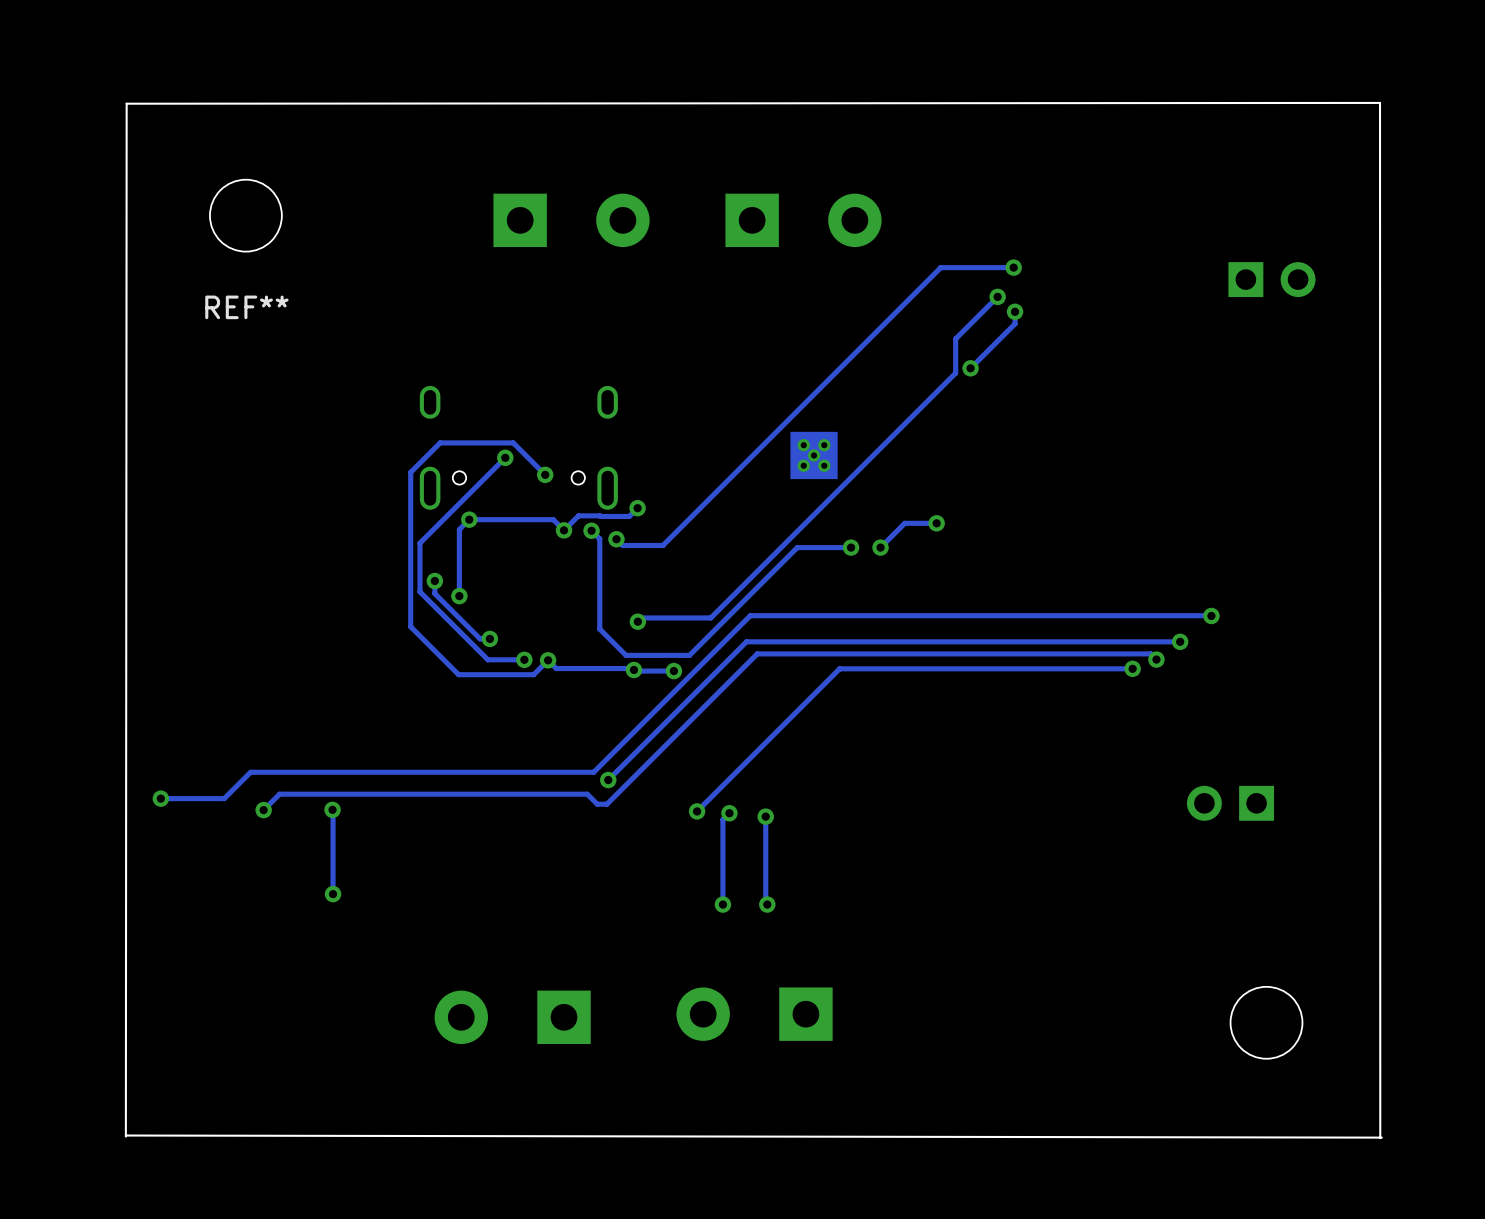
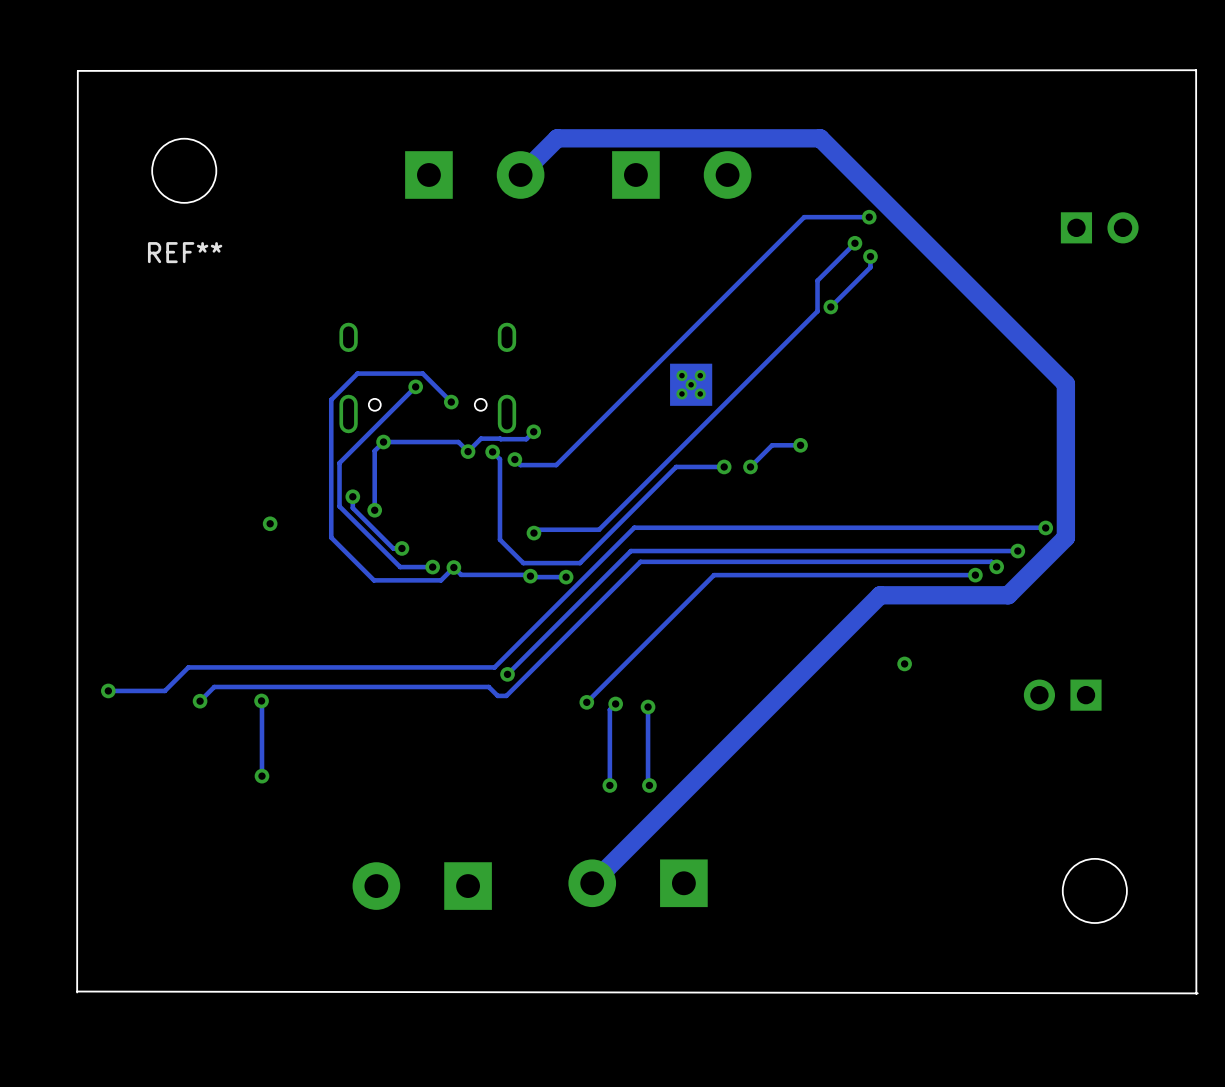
track: none -> (520, 174) (557, 138) (820, 138) (1065, 383) (1065, 537) (1008, 595) (880, 595) (592, 883)
via: none -> (270, 523)
via: none -> (904, 663)

